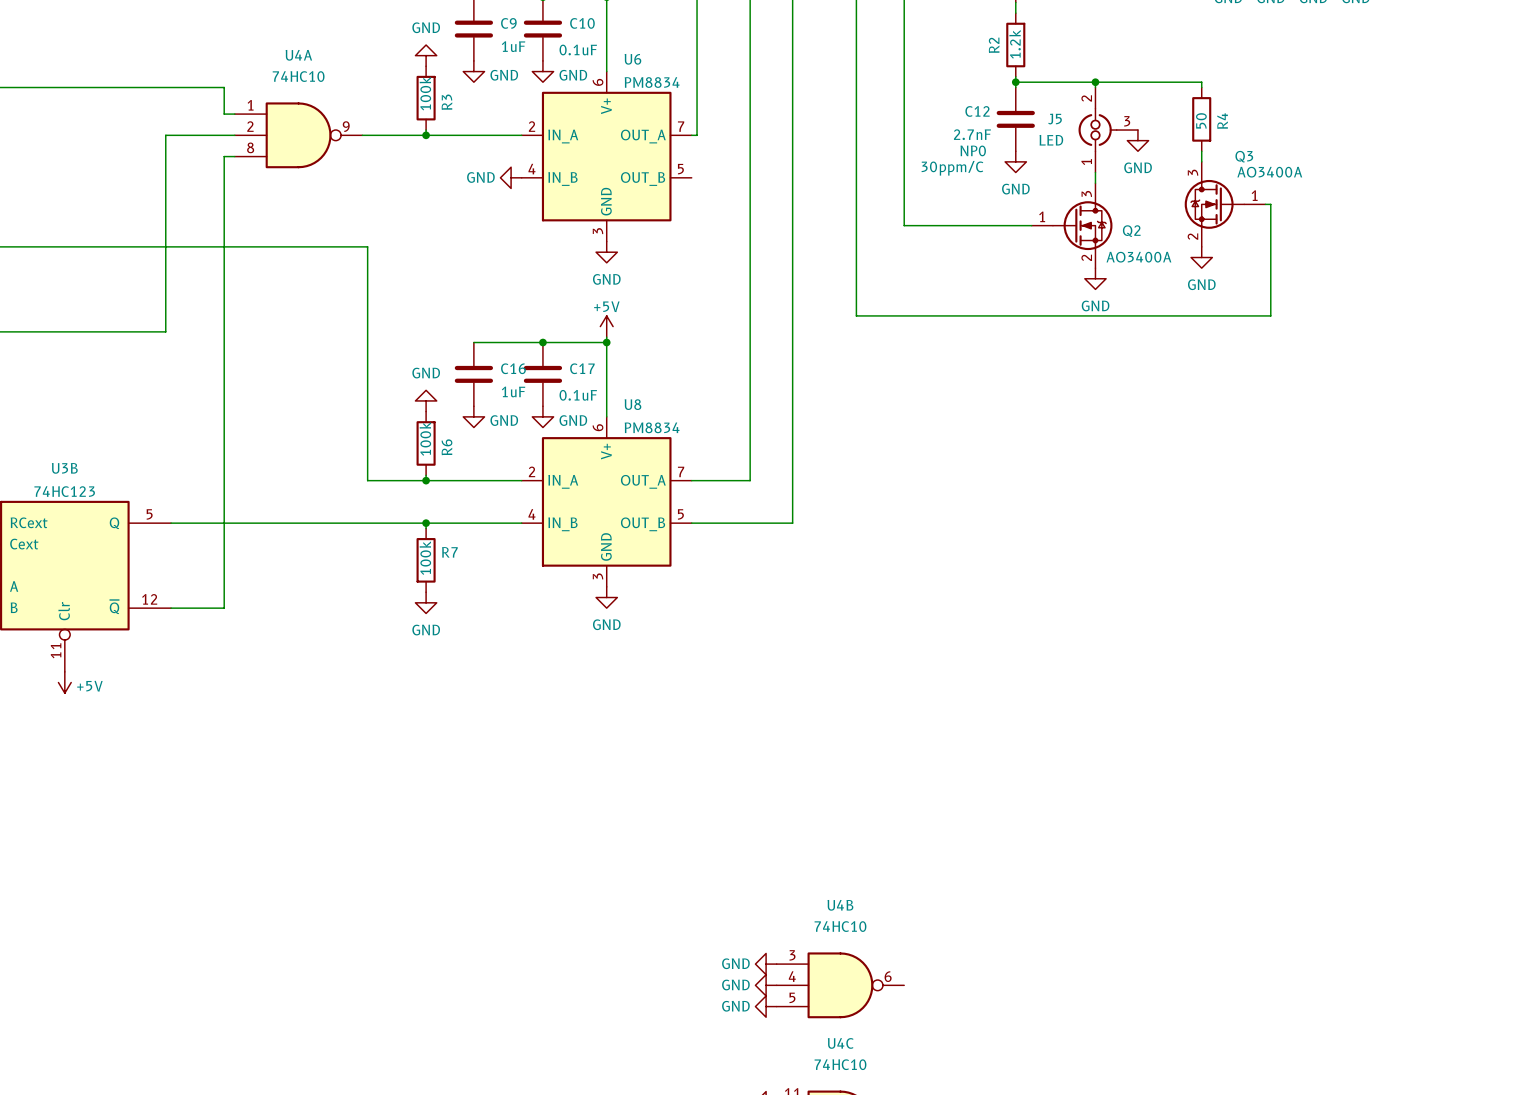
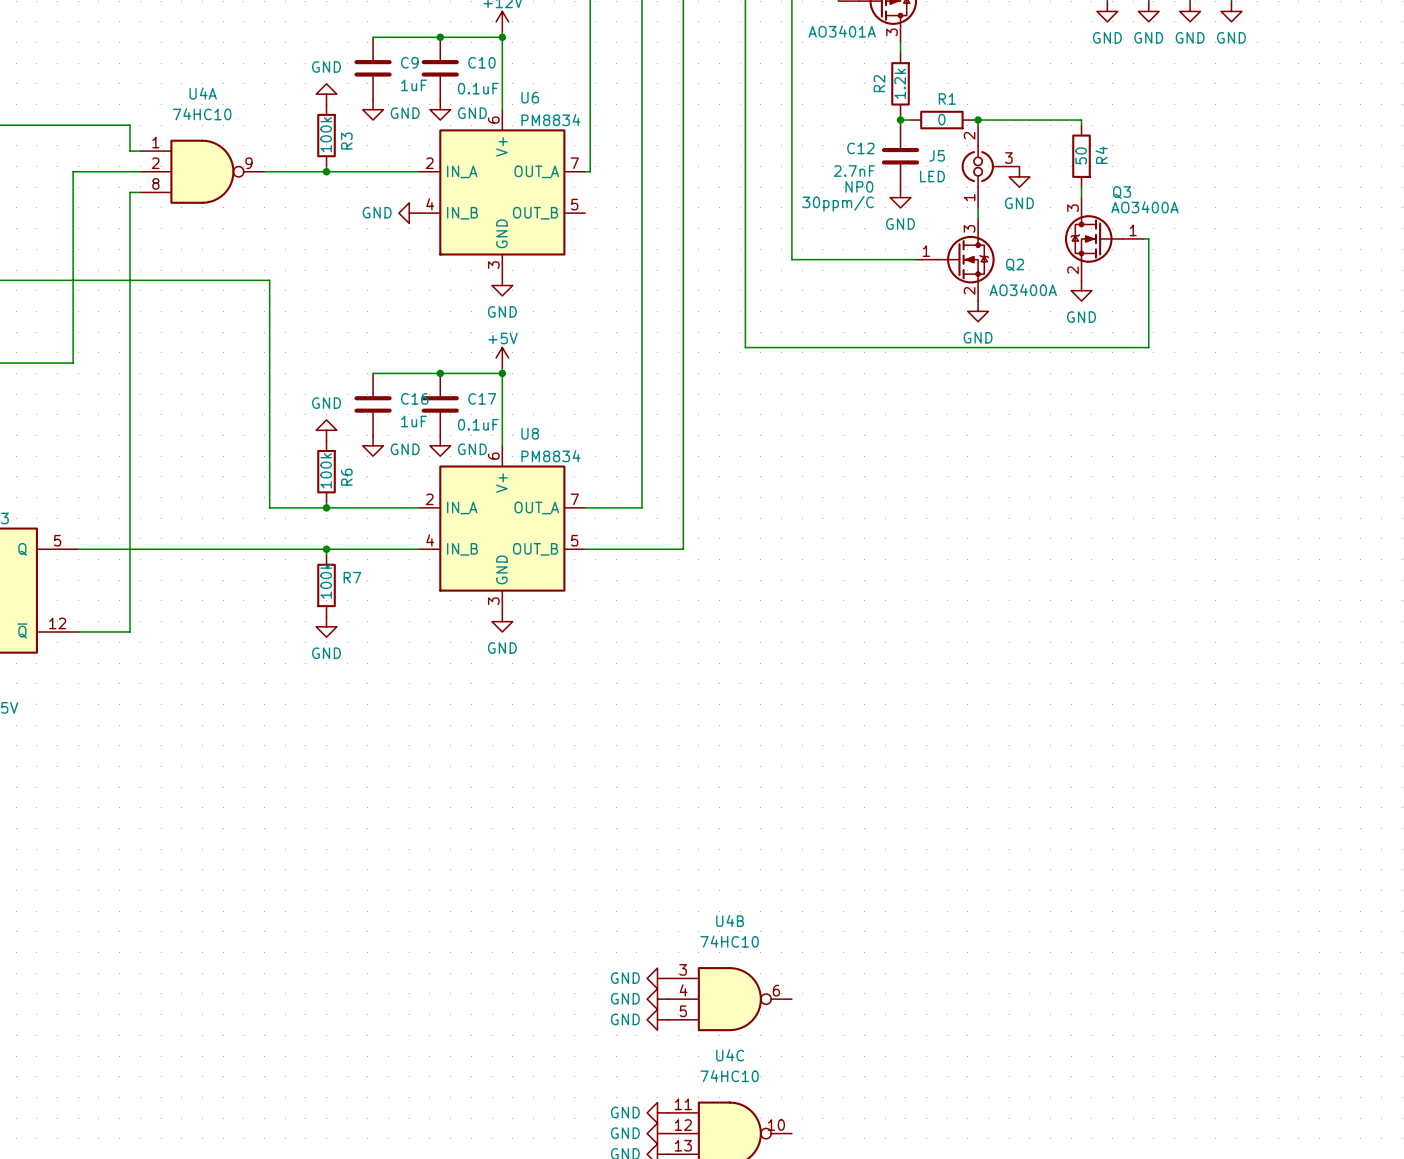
wire: (1026, 82) (1090, 82) -> none
R1: none -> 0 (941, 120)

